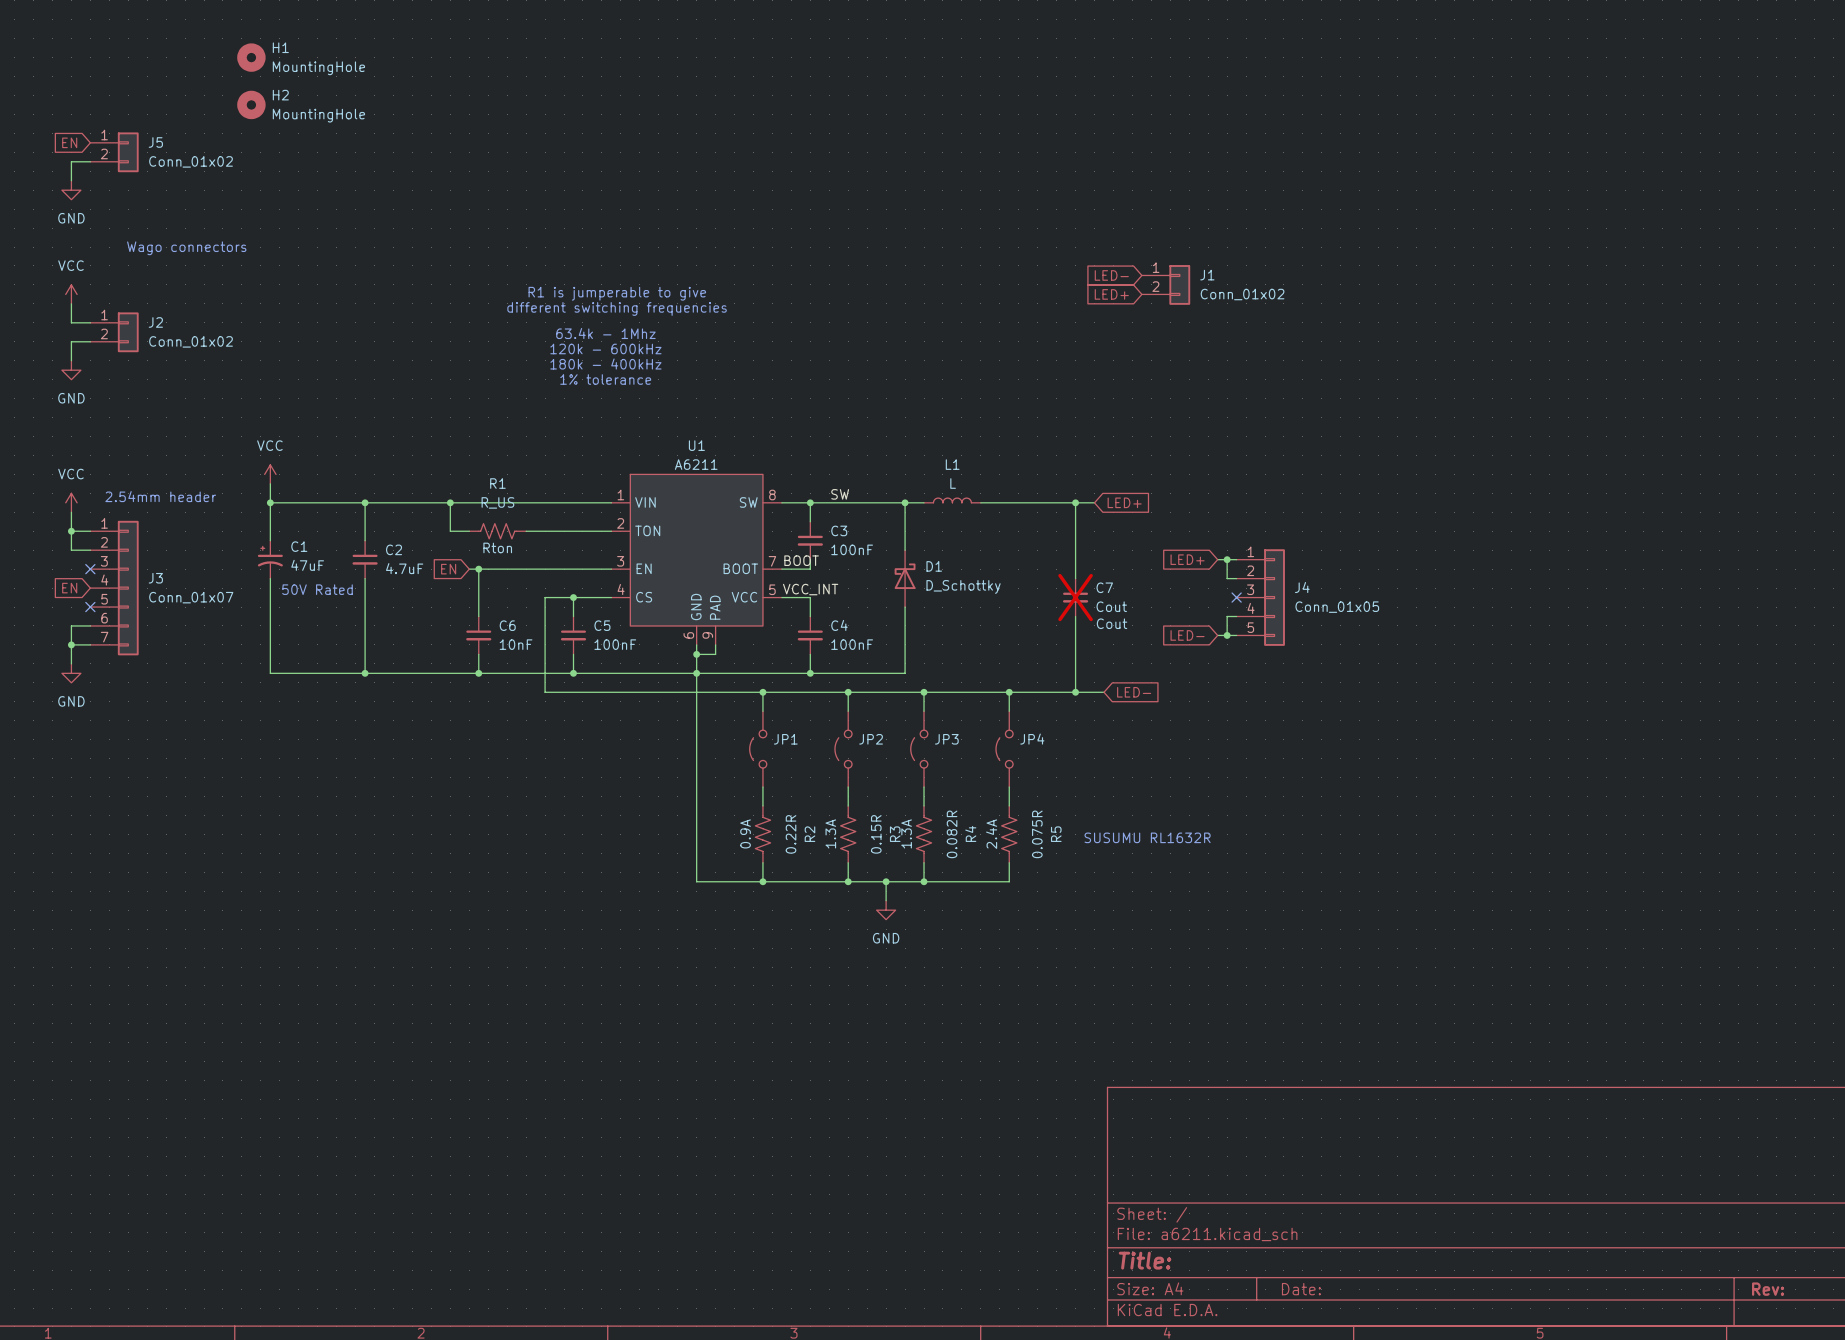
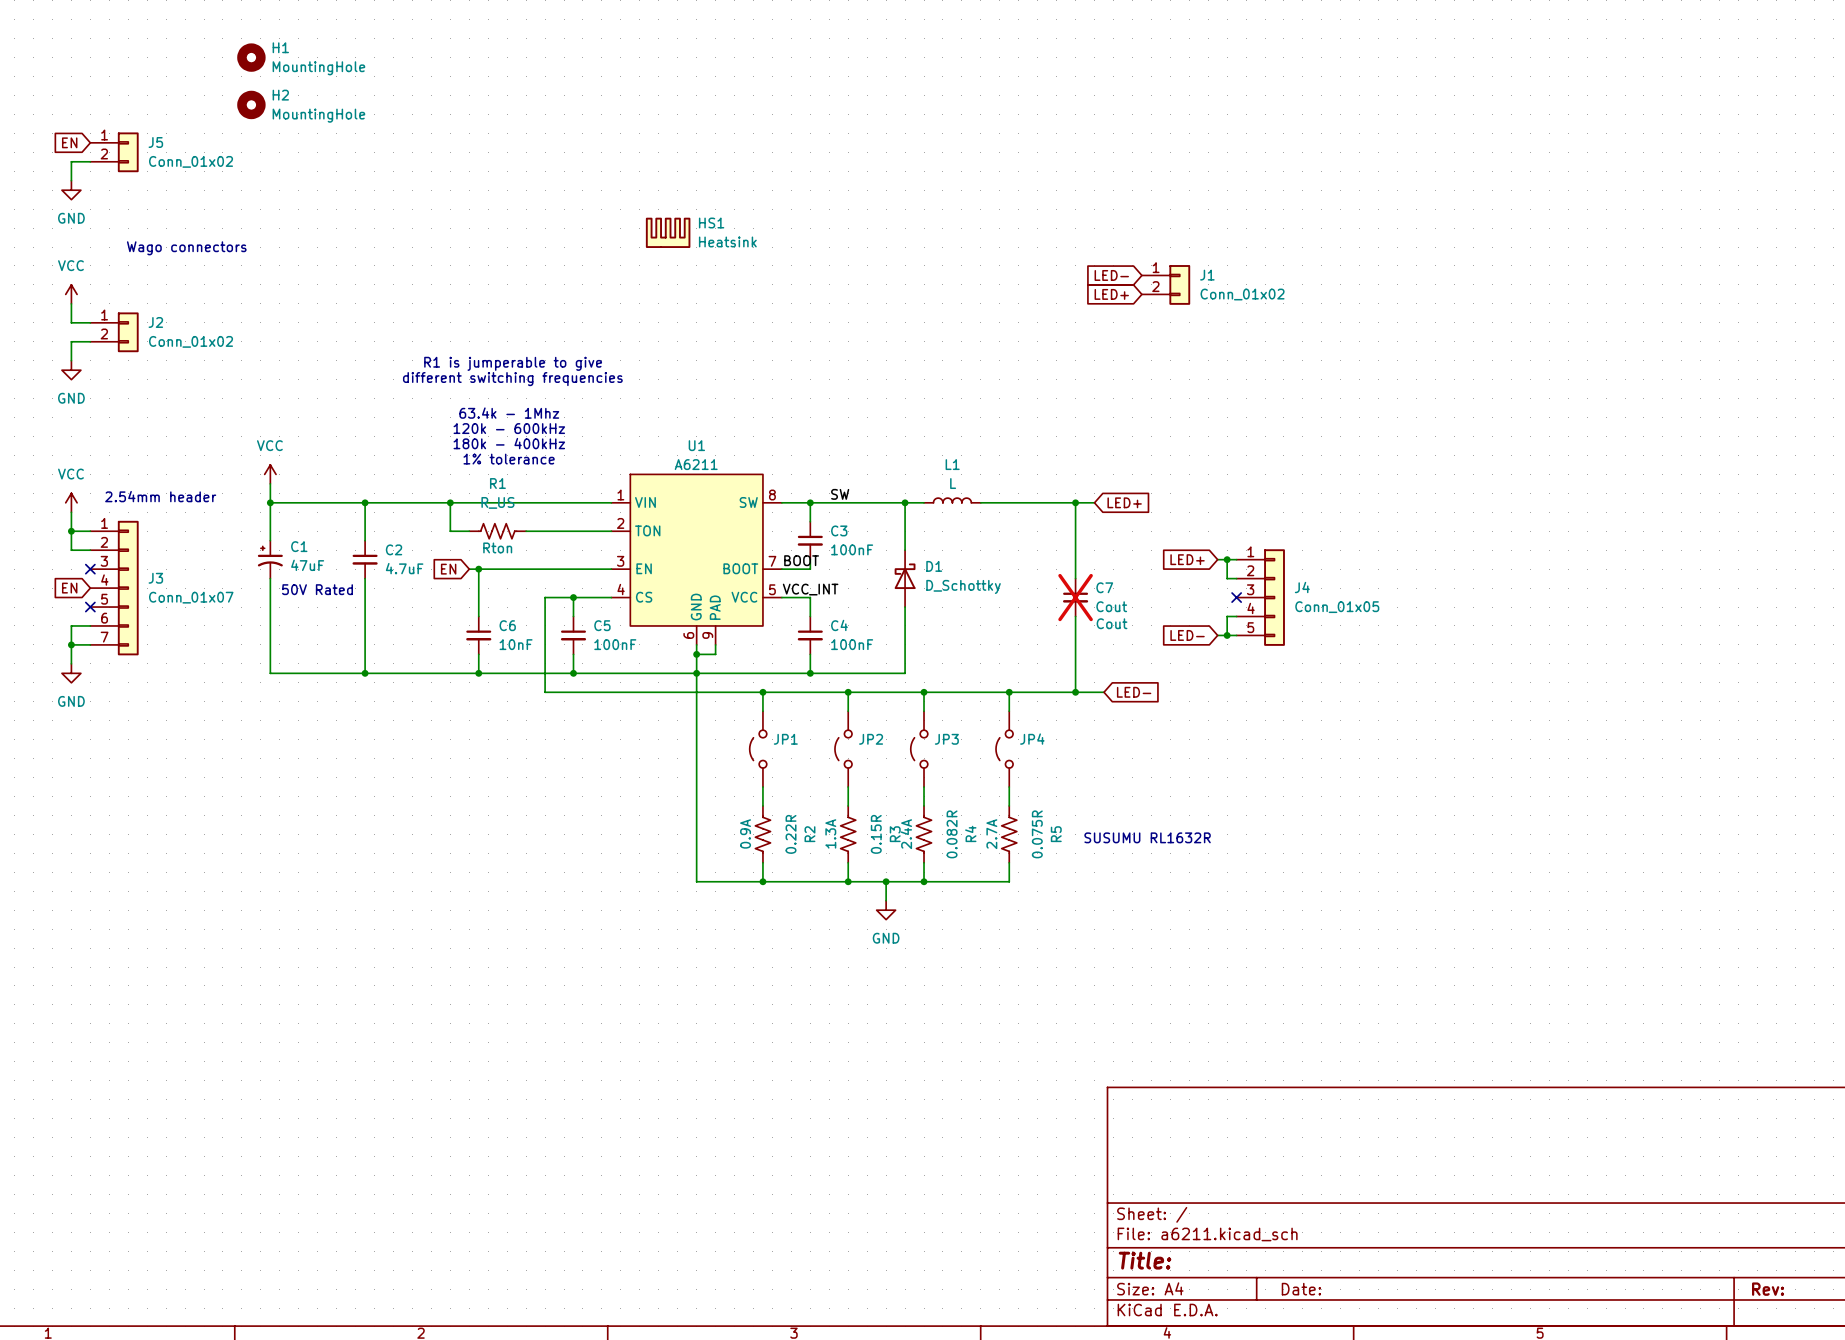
HS1: none -> Heatsink (668, 232)
text position: R1 is jumperable to give (617, 293) -> R1 is jumperable to give (513, 363)
text position: different switching frequencies (617, 308) -> different switching frequencies (512, 379)
text position: 63.4k - 1Mhz (605, 333) -> 63.4k - 1Mhz (509, 413)
text position: 120k - 600kHz (605, 348) -> 120k - 600kHz (509, 428)
text position: 180k - 400kHz (605, 364) -> 180k - 400kHz (509, 443)
text position: 1% tolerance (605, 379) -> 1% tolerance (509, 459)
R4 text: 1.3A (906, 833) -> 2.4A (906, 834)
R5 text: 2.4A (991, 834) -> 2.7A (991, 834)

